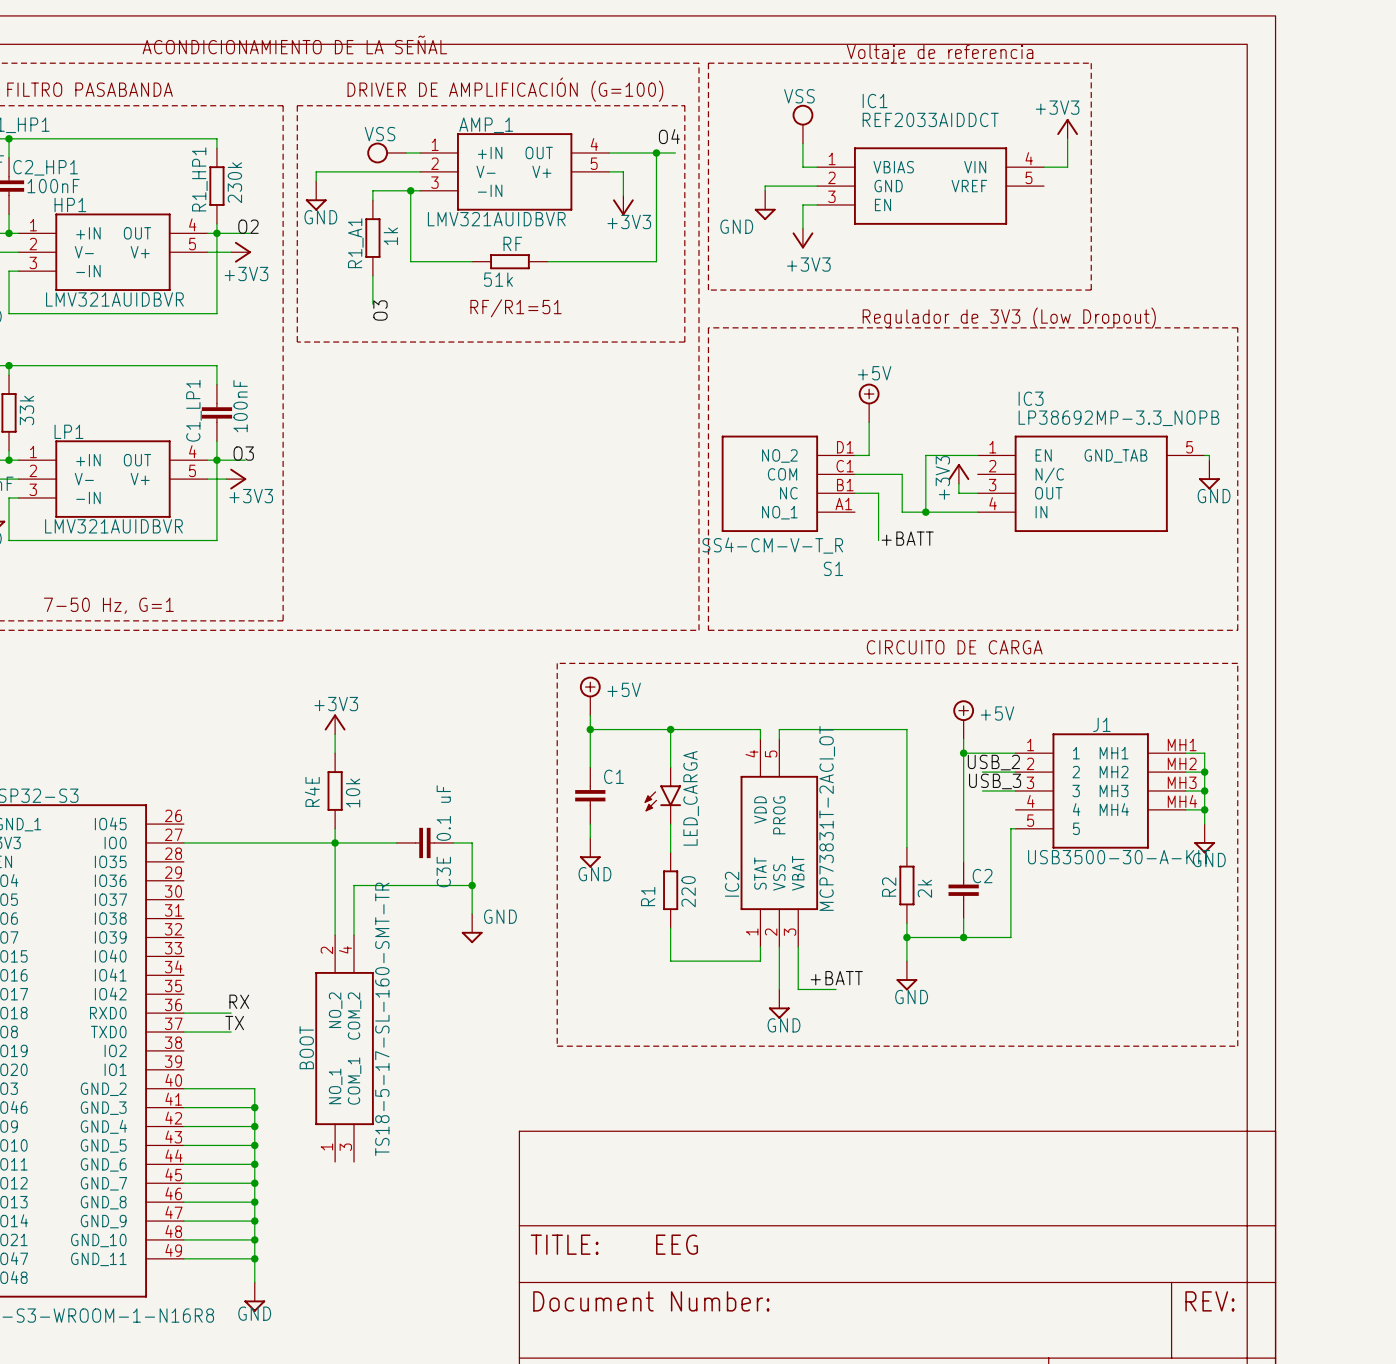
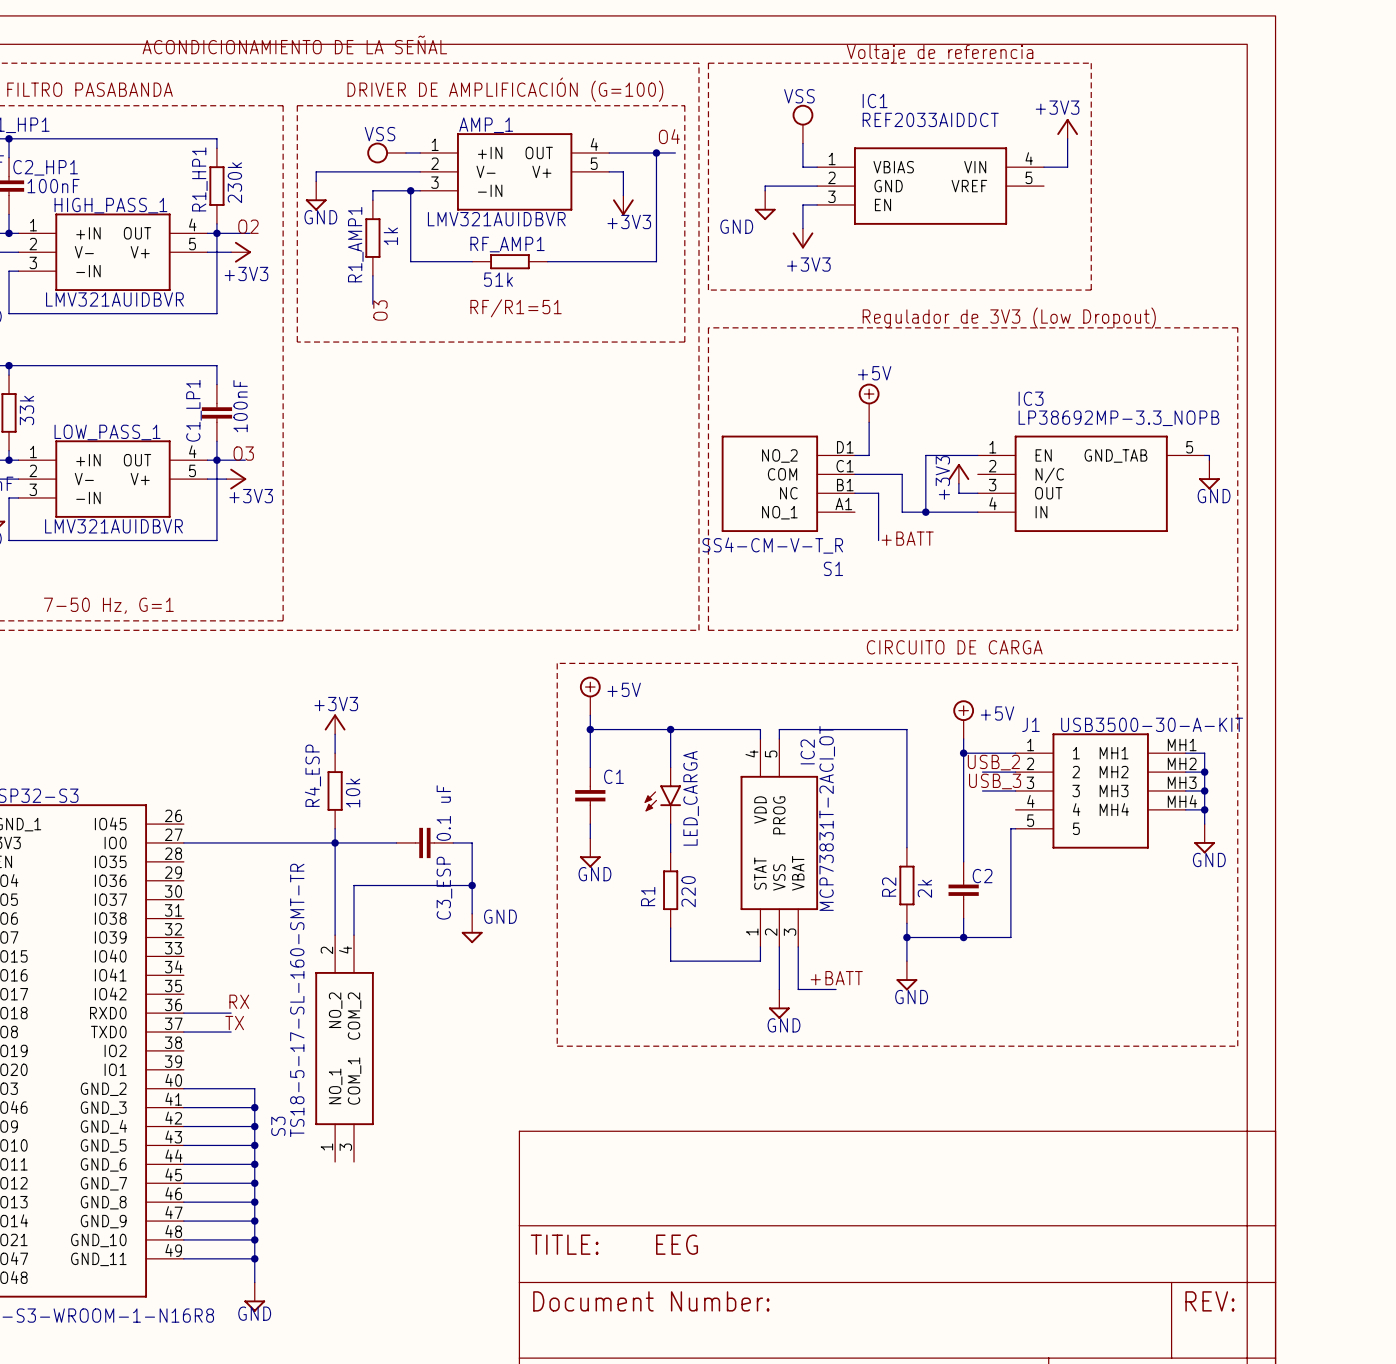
HP1 name: HP1 (70, 204) -> HIGH_PASS_1 (110, 205)
R1_A1 name: R1_A1 (355, 243) -> R1_AMP1 (355, 244)
RF name: RF (512, 243) -> RF_AMP1 (507, 244)
LP1 name: LP1 (68, 431) -> LOW_PASS_1 (107, 432)
J1 name position: J1 (1101, 724) -> J1 (1030, 724)
R4E name: R4E (312, 791) -> R4_ESP (312, 775)
J1 value position: USB3500-30-A-KIT (1119, 857) -> USB3500-30-A-KIT (1152, 724)
C3E name: C3E (443, 872) -> C3_ESP (444, 888)
IC2 name position: IC2 (732, 884) -> IC2 (807, 751)
BOOT value position: TS18-5-17-SL-160-SMT-TR (382, 1019) -> TS18-5-17-SL-160-SMT-TR (297, 1000)
BOOT name: BOOT (306, 1047) -> S3 (278, 1126)

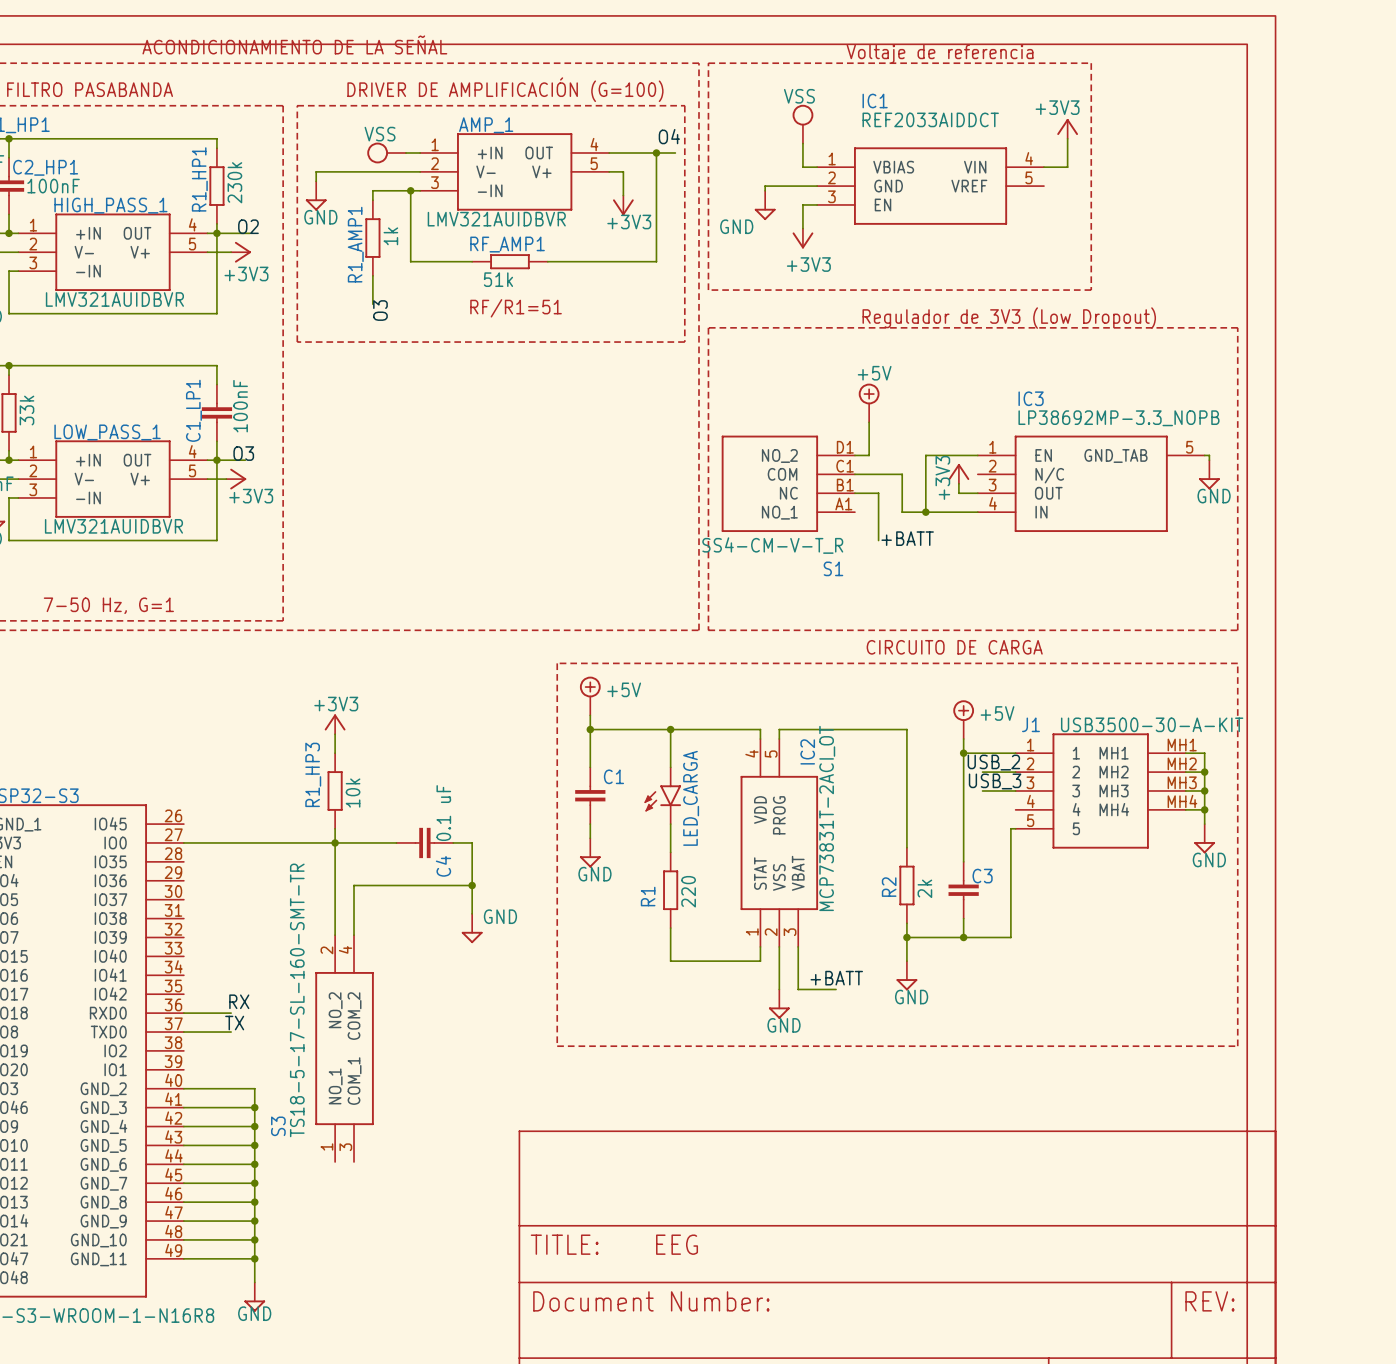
R4_ESP name: R4_ESP (312, 775) -> R1_HP3 (313, 774)
C2 name: C2 (982, 876) -> C3 (982, 876)
C3_ESP name: C3_ESP (444, 888) -> C4 (443, 866)

